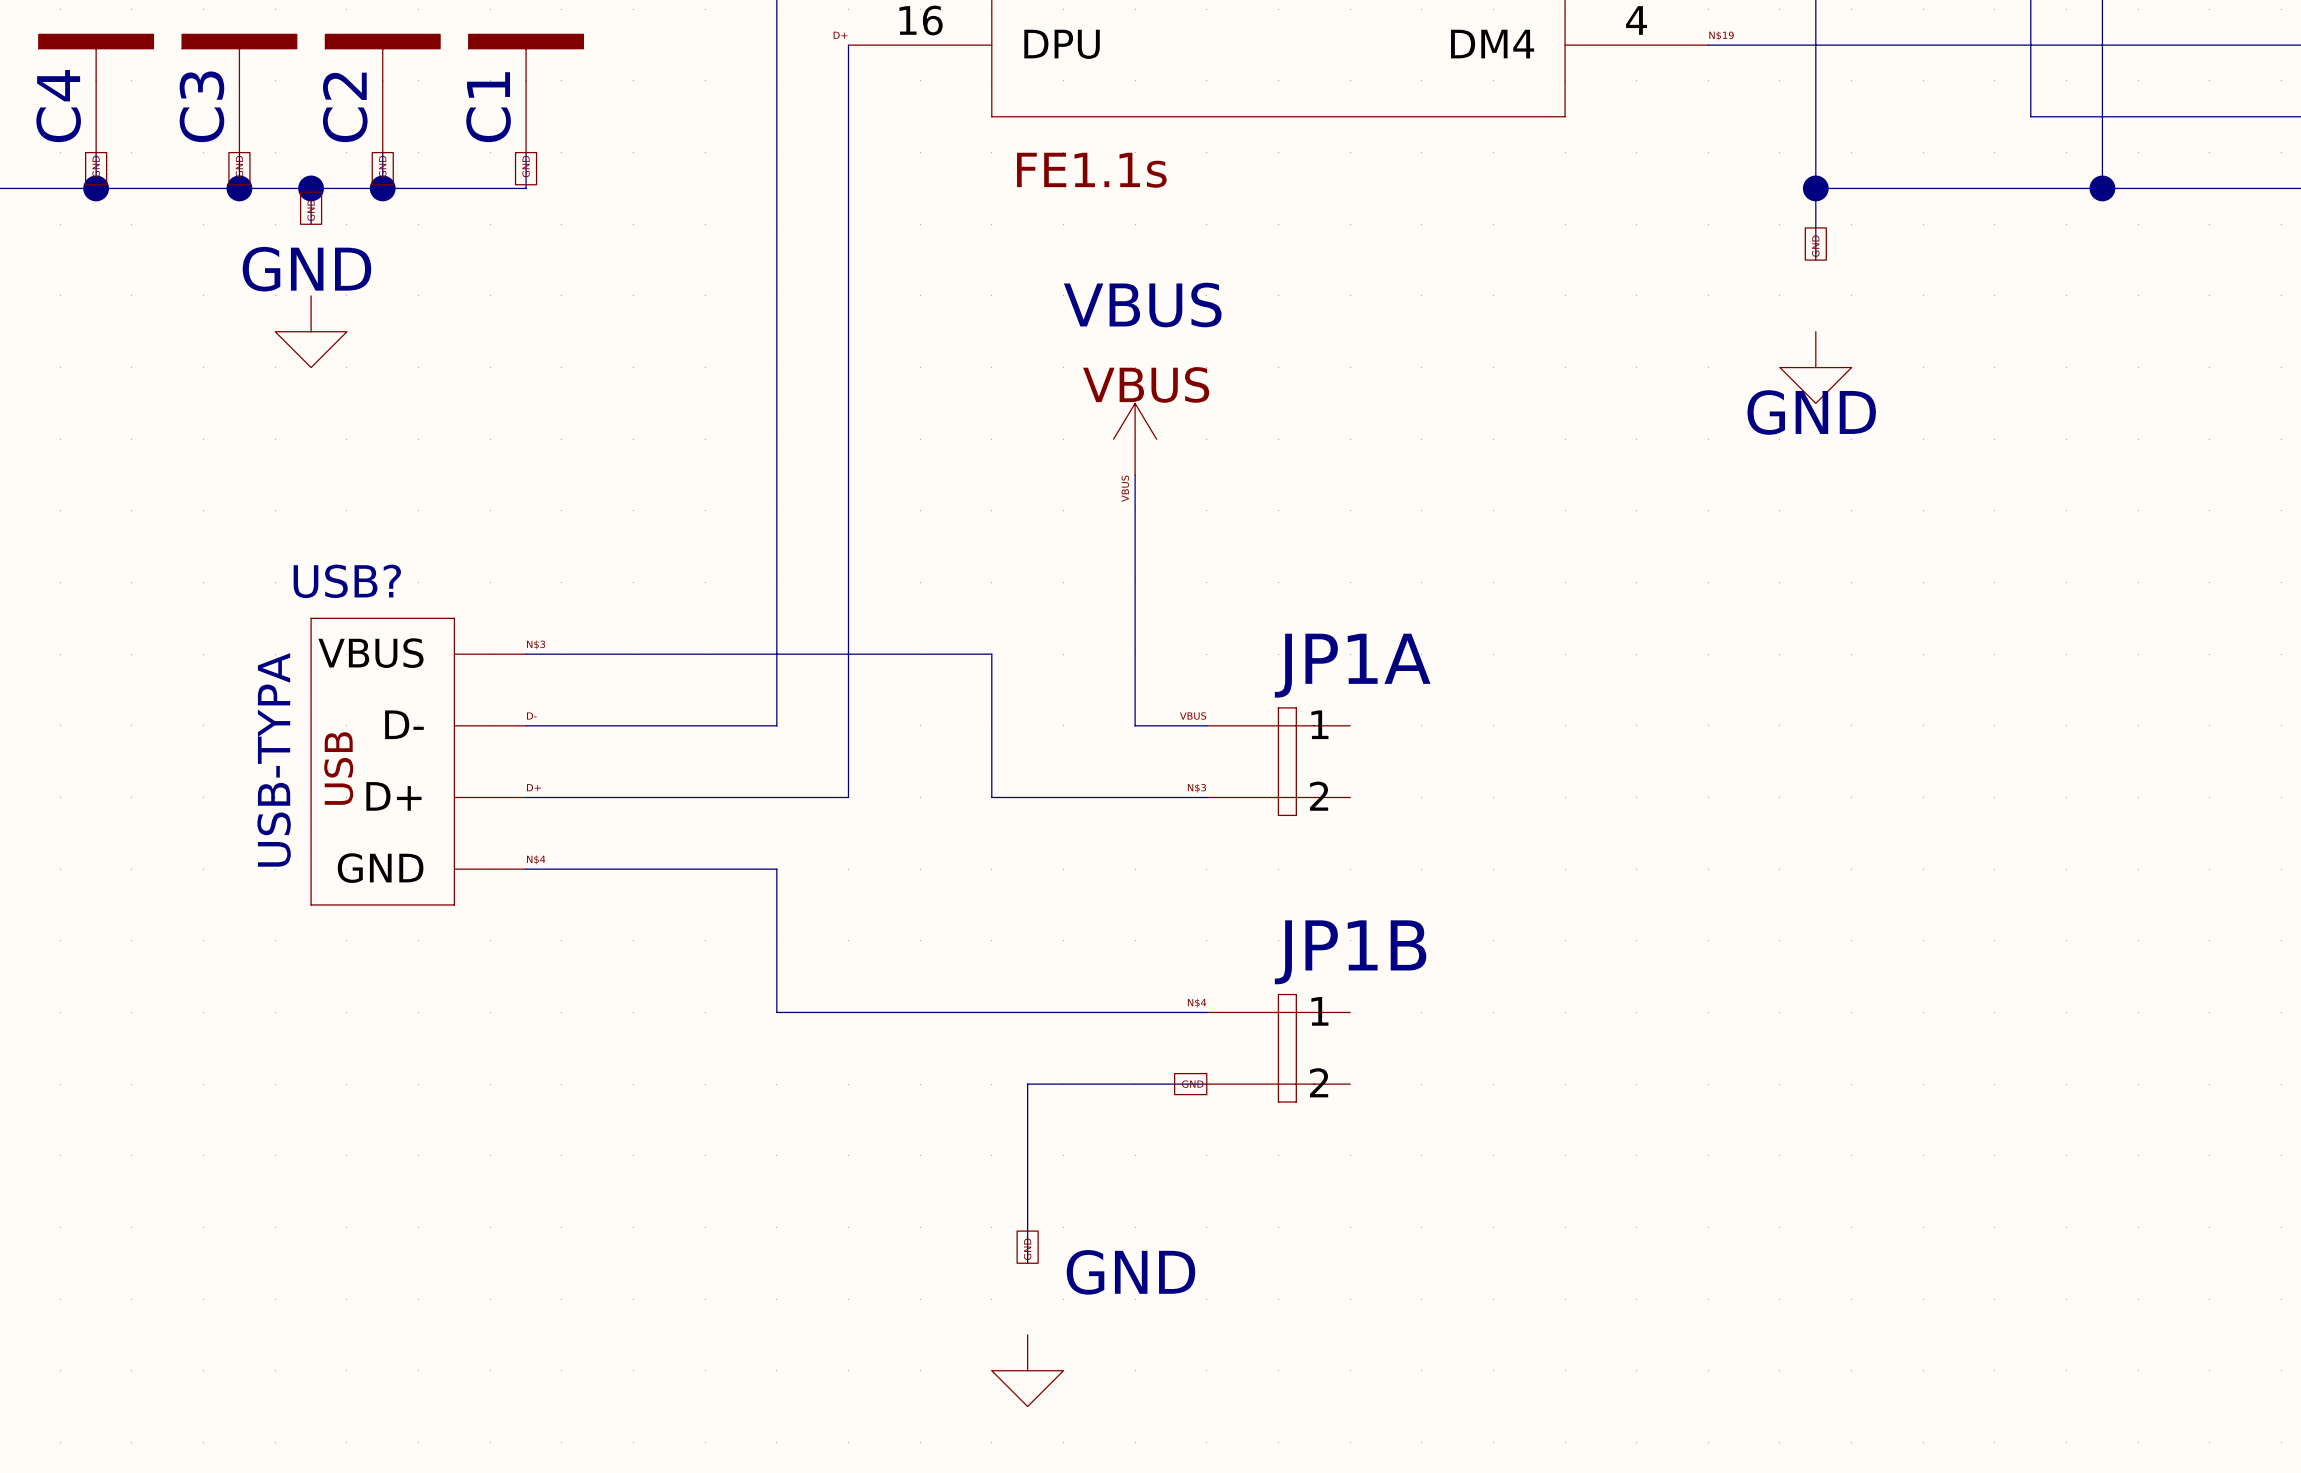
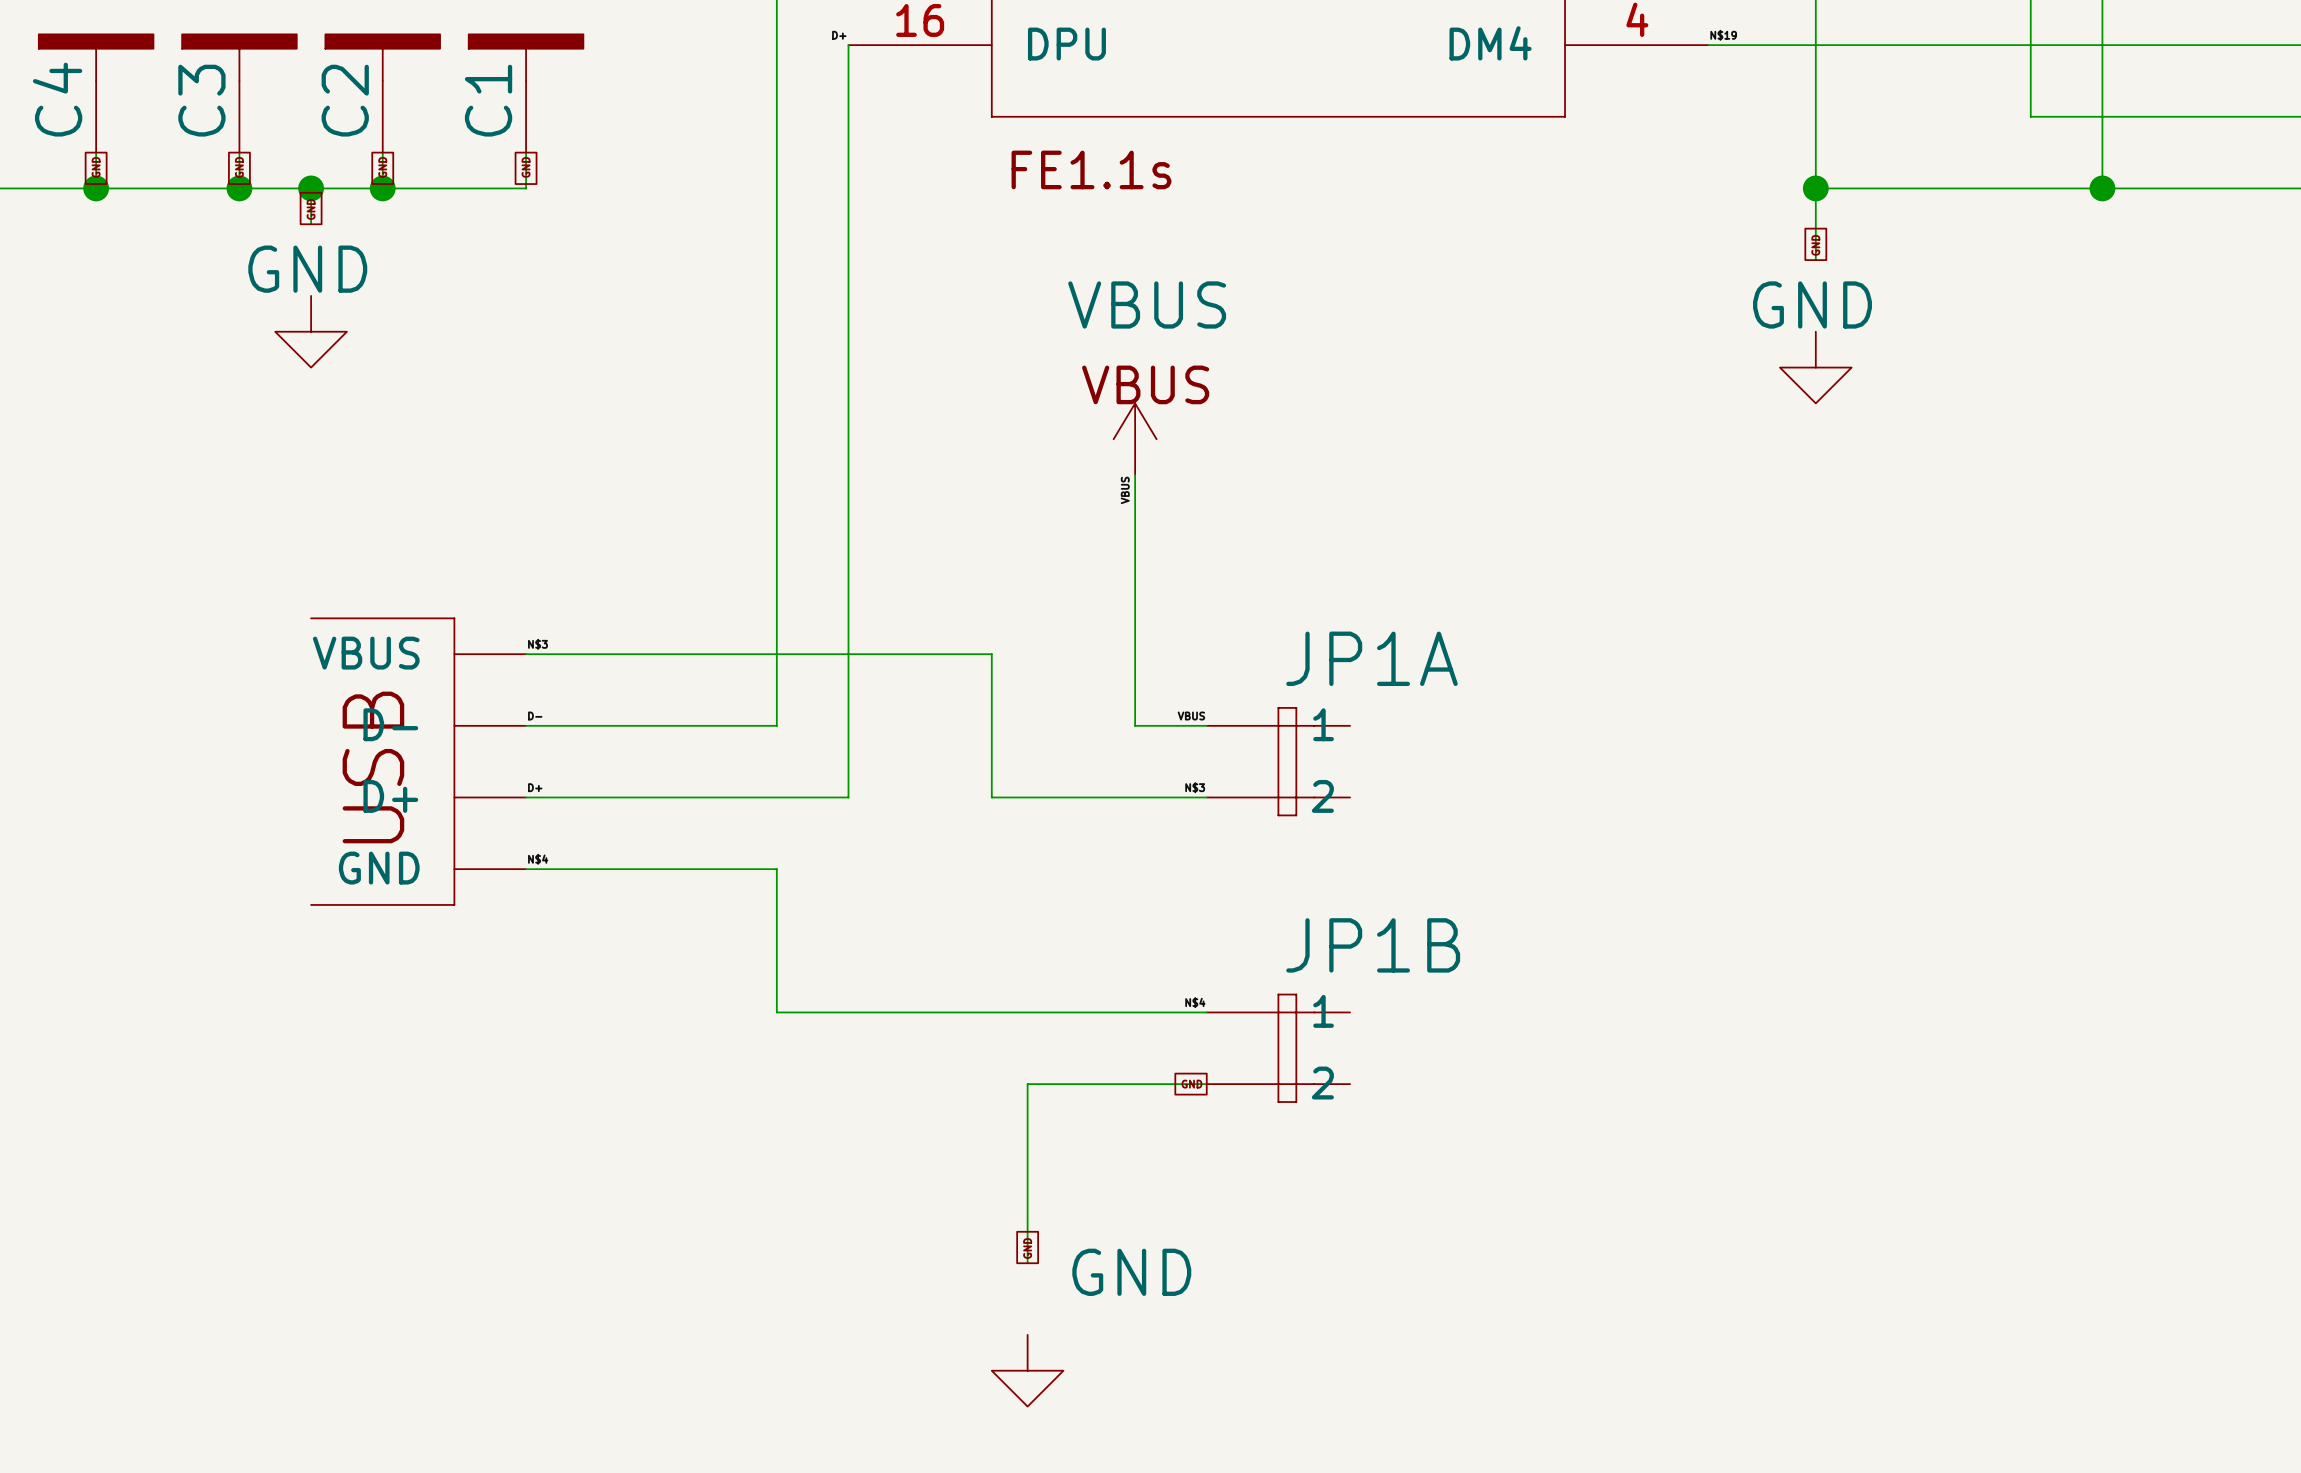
power symbol text position: GND (1811, 412) -> GND (1812, 304)
USB?: USB-TYPA (418, 761) -> none
part: none -> (418, 761)

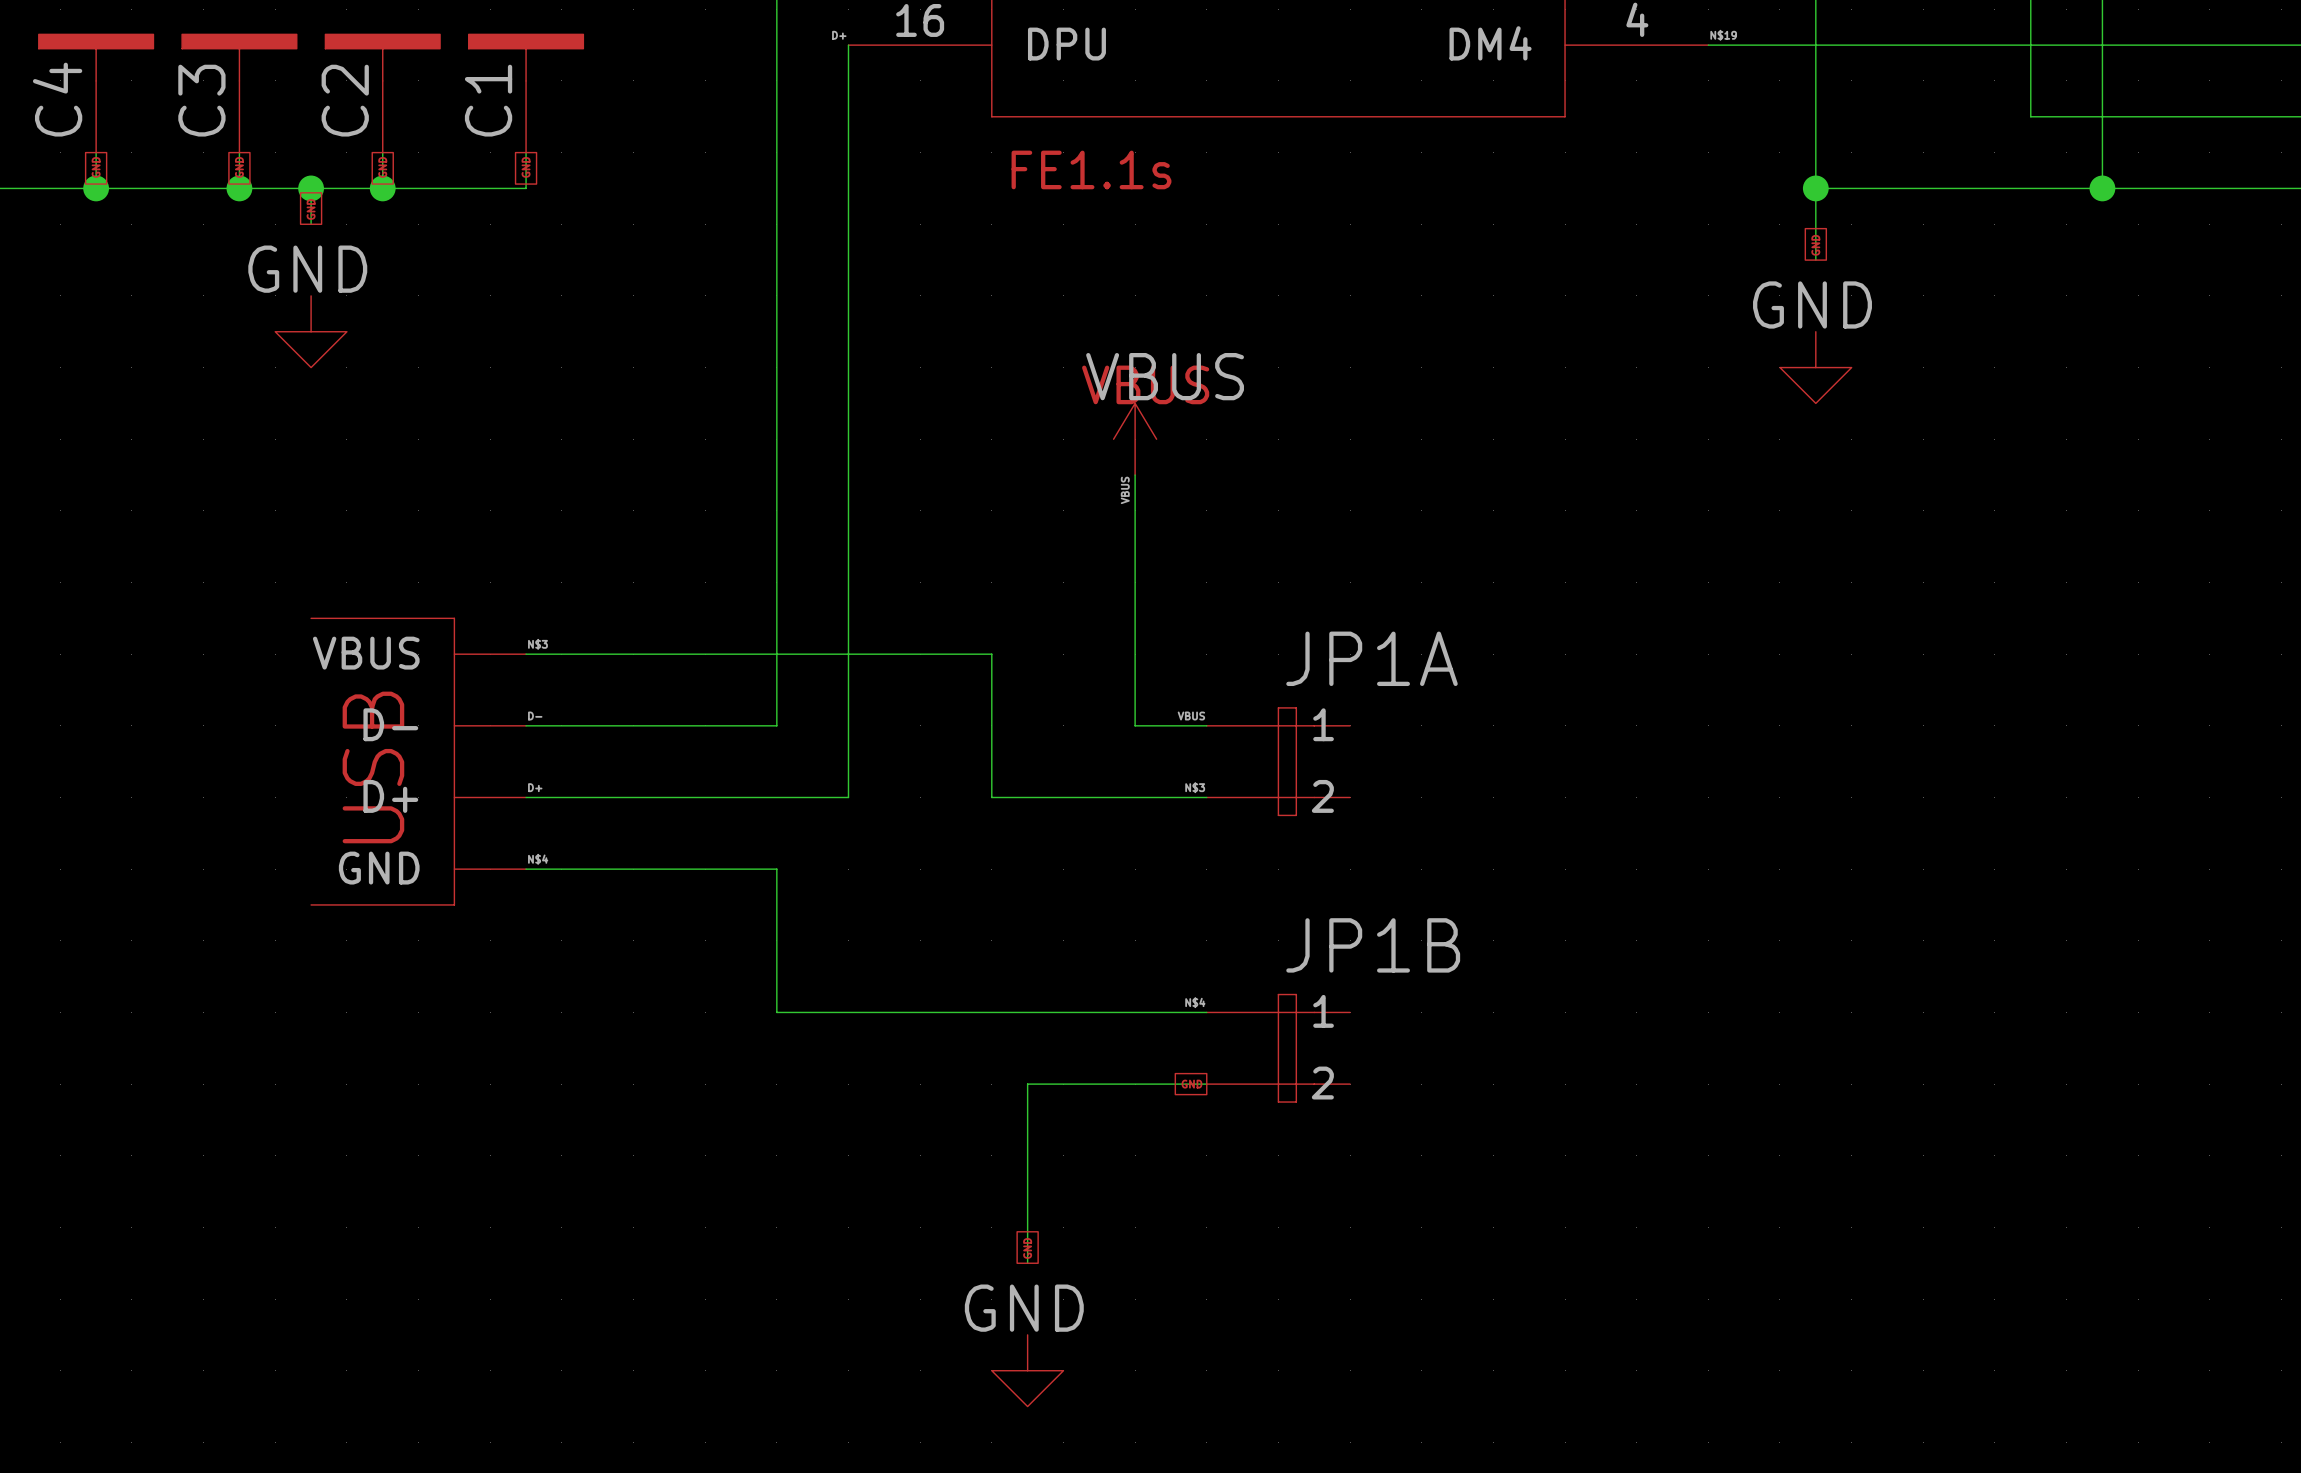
power symbol text position: VBUS (1147, 304) -> VBUS (1165, 376)
power symbol text position: GND (1131, 1272) -> GND (1024, 1308)

